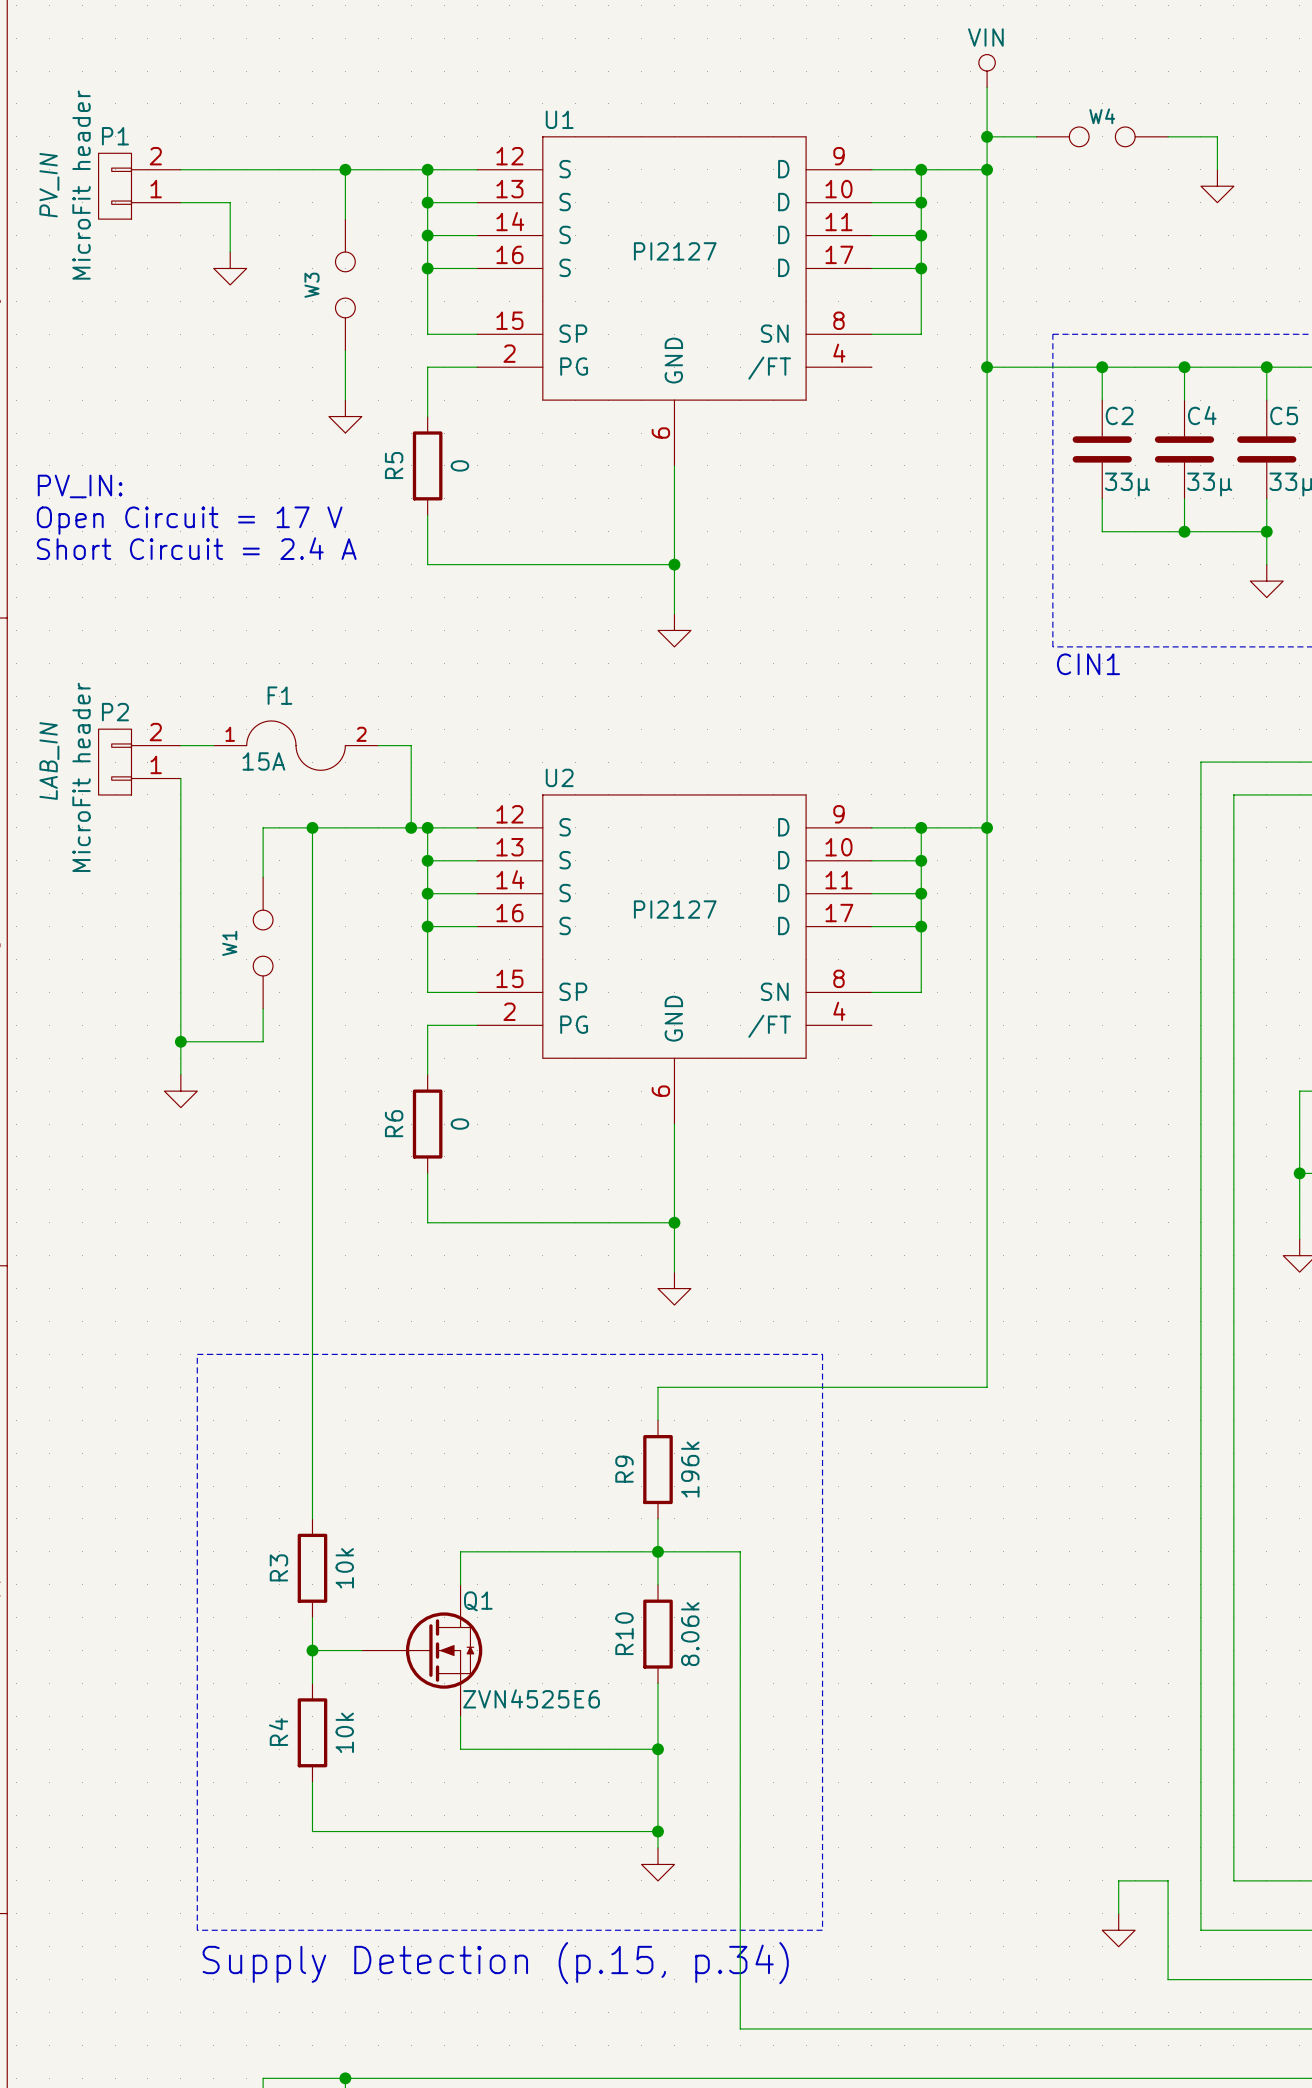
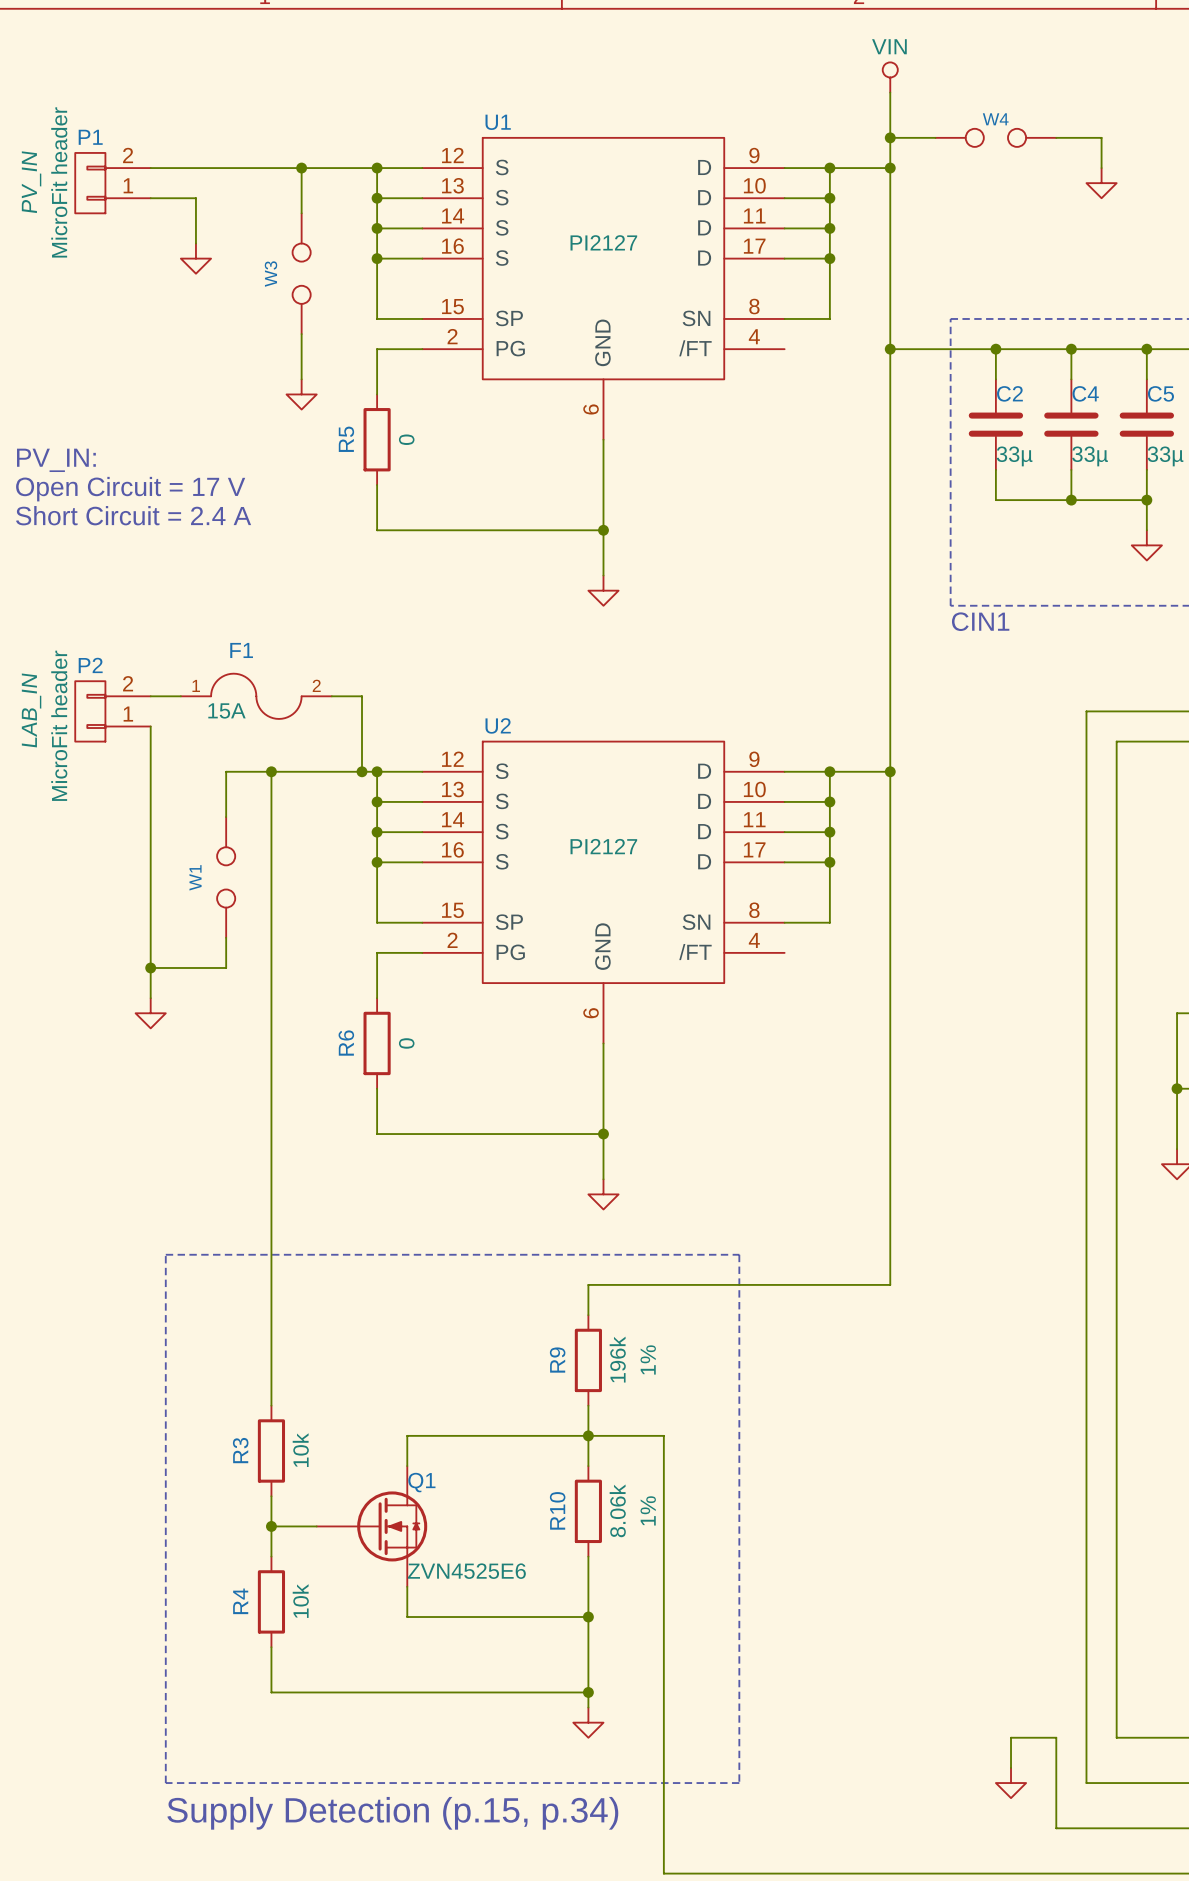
R9 text: none -> 1% (648, 1359)
R10 text: none -> 1% (648, 1510)

